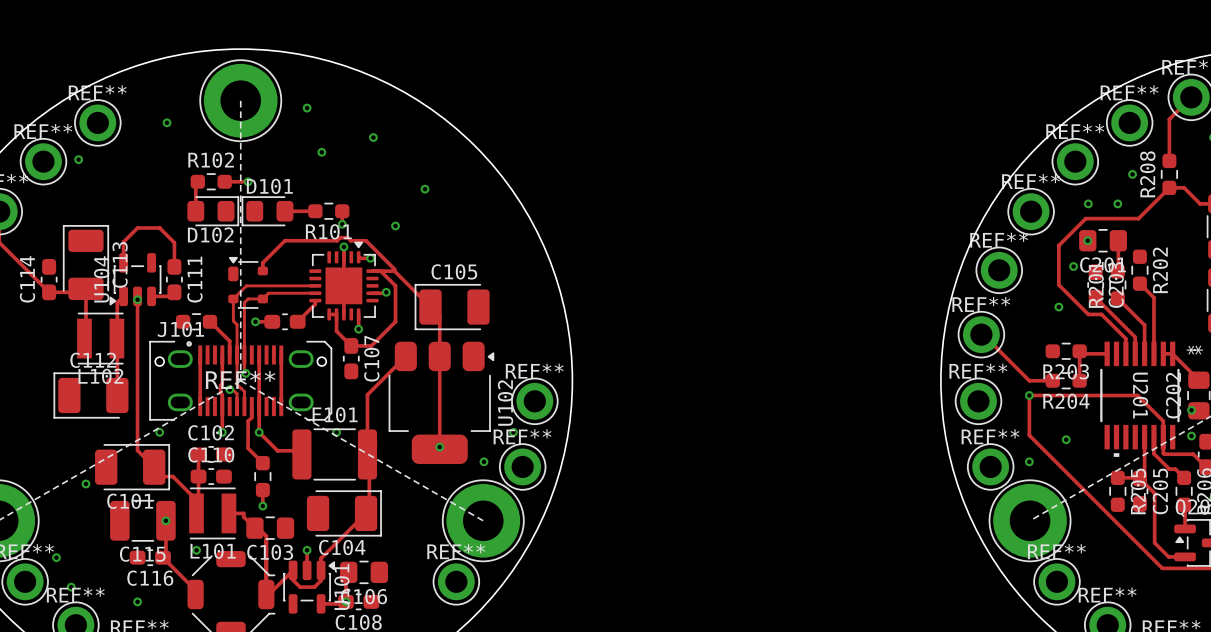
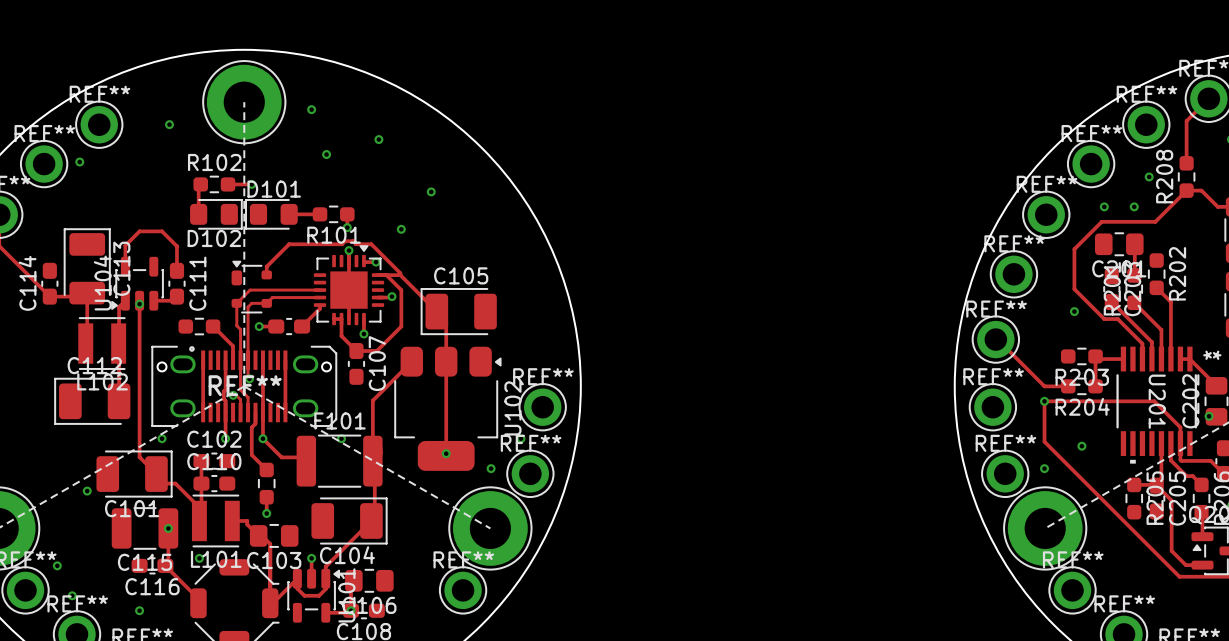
via: (1087, 240) -> none
via: (1073, 266) -> none
J101 name: J101 (180, 329) -> none
via: (1191, 436) -> none

